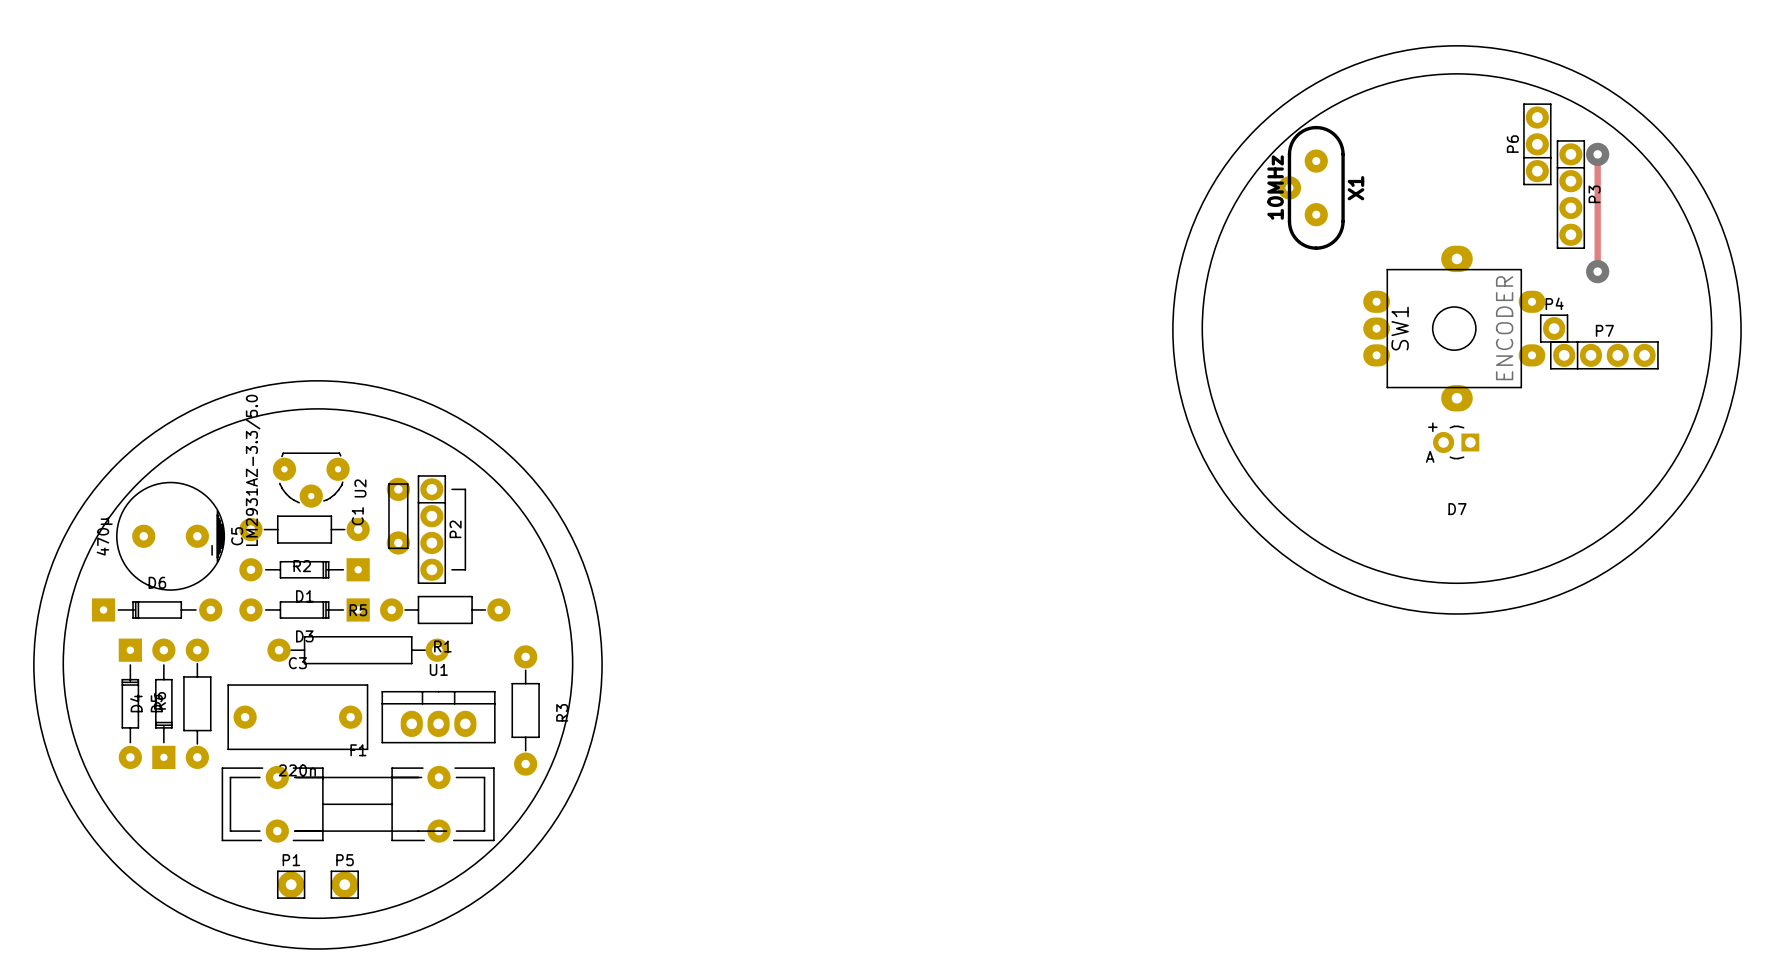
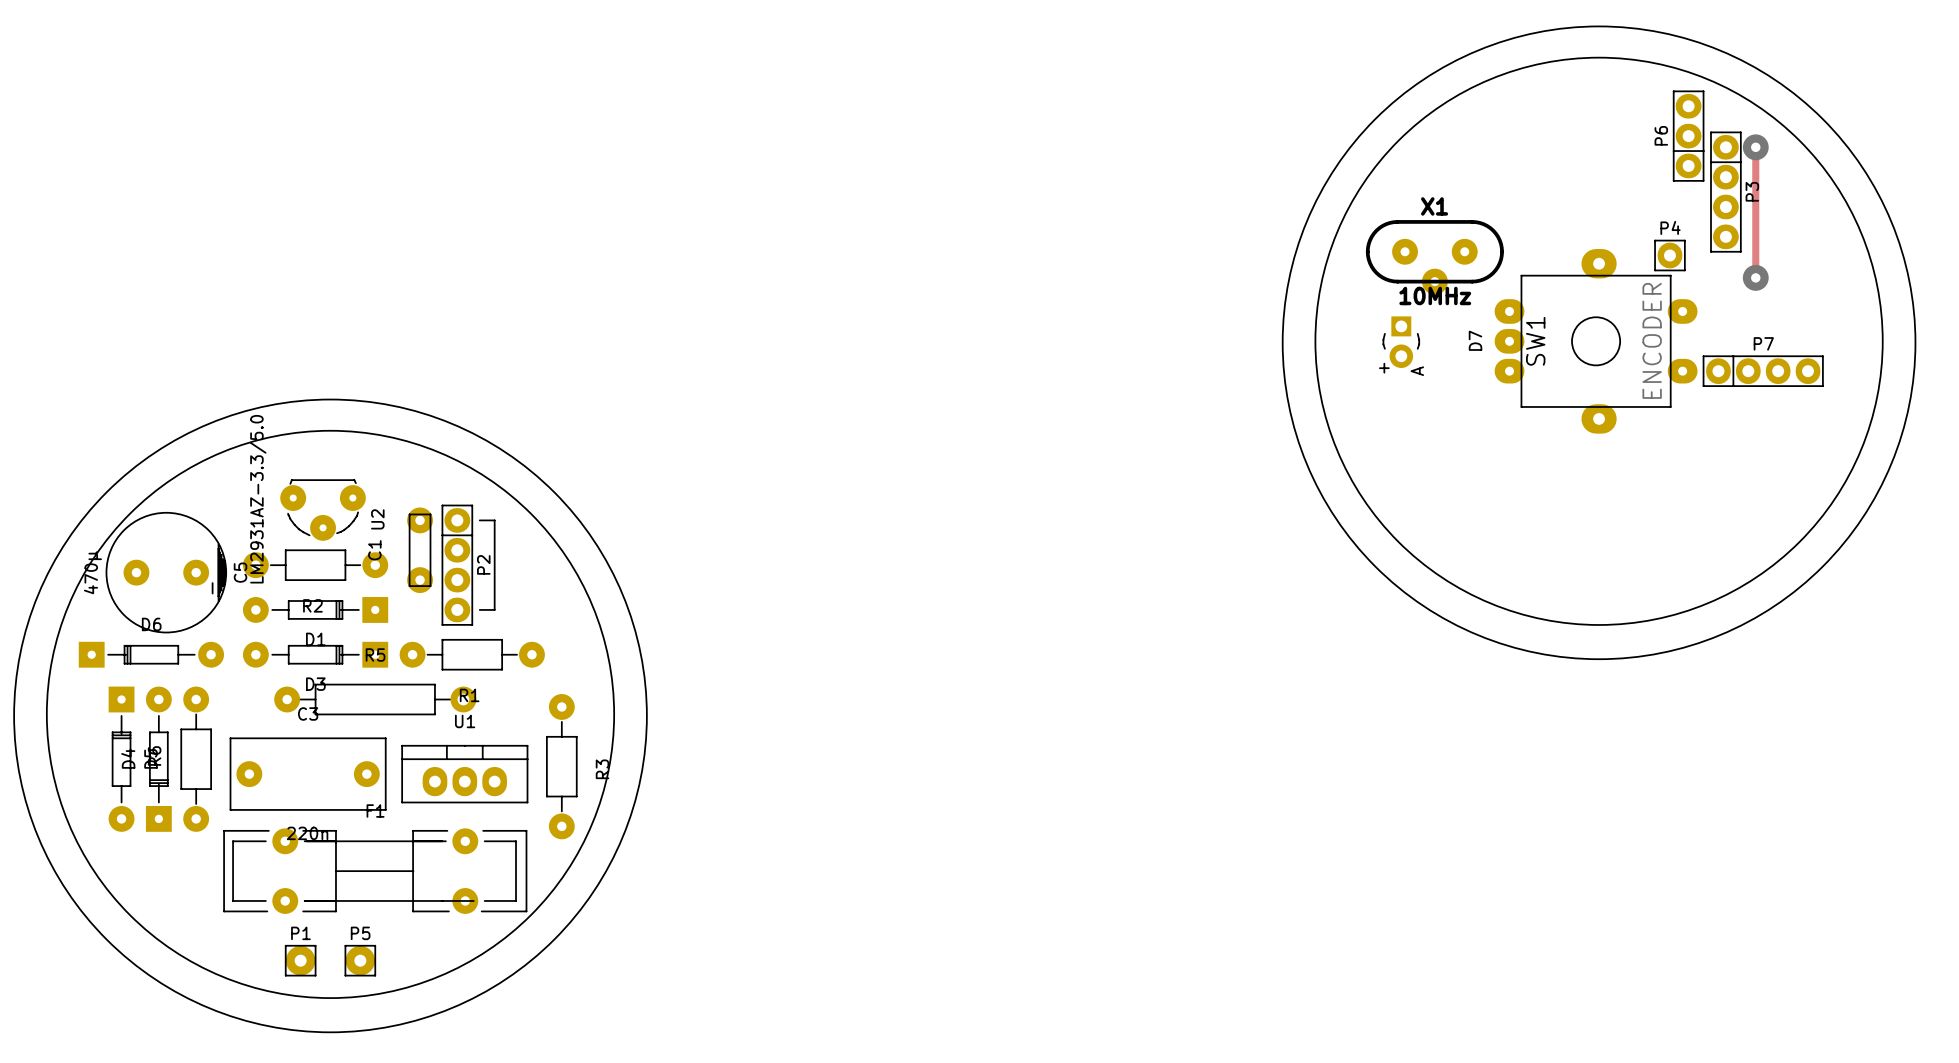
X1 rotation: 0° (1311, 187) -> 90° counterclockwise (1434, 257)
P4 position: (1554, 328) -> (1669, 255)
D7 rotation: 0° (1456, 442) -> 90° counterclockwise (1401, 342)
D7 position: (1456, 442) -> (1401, 342)

